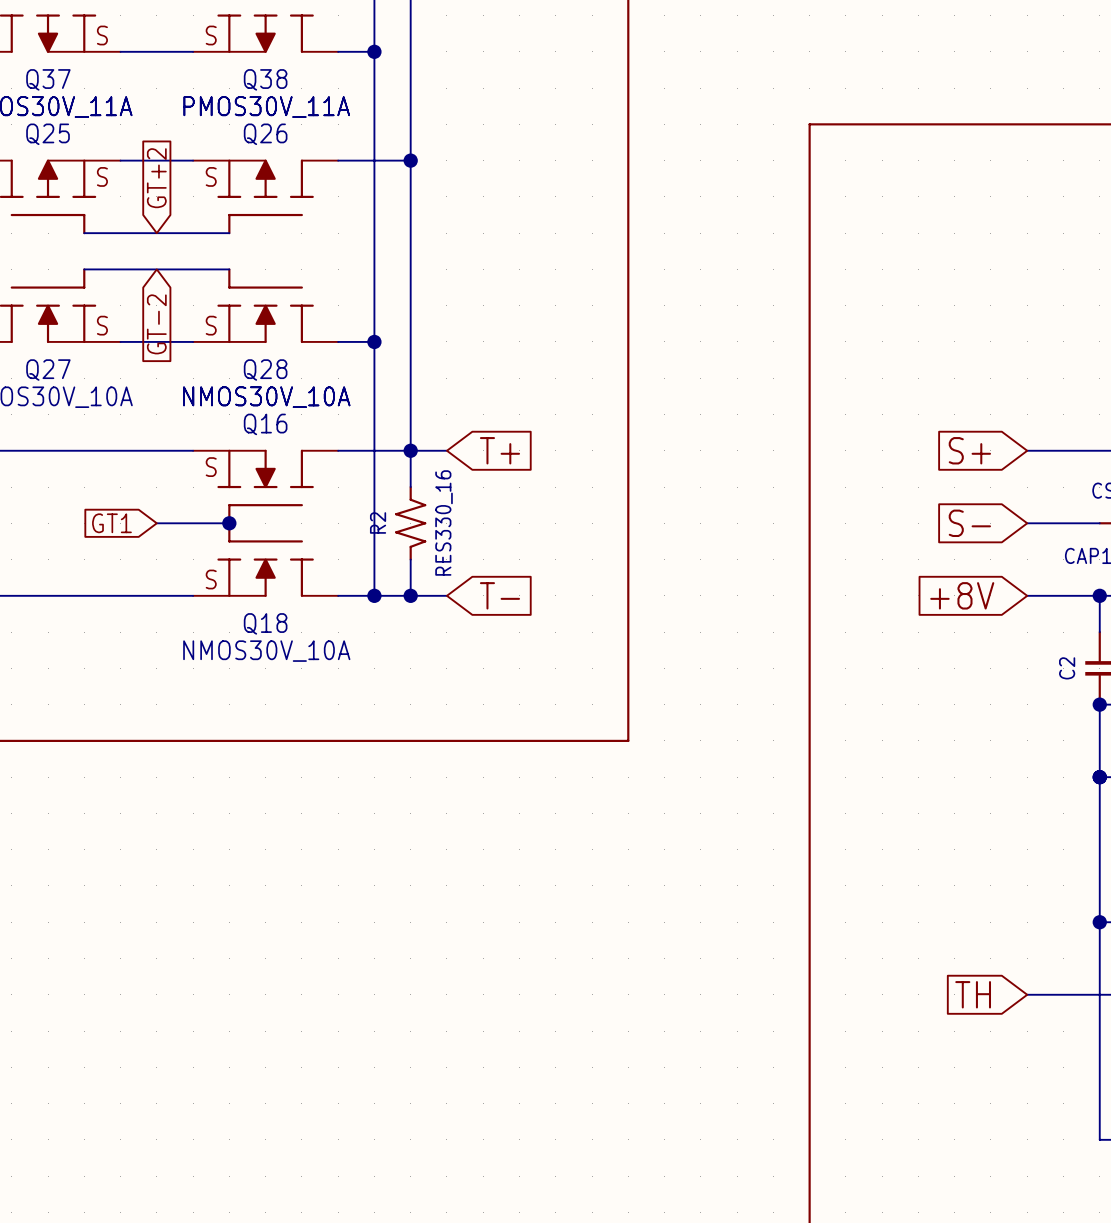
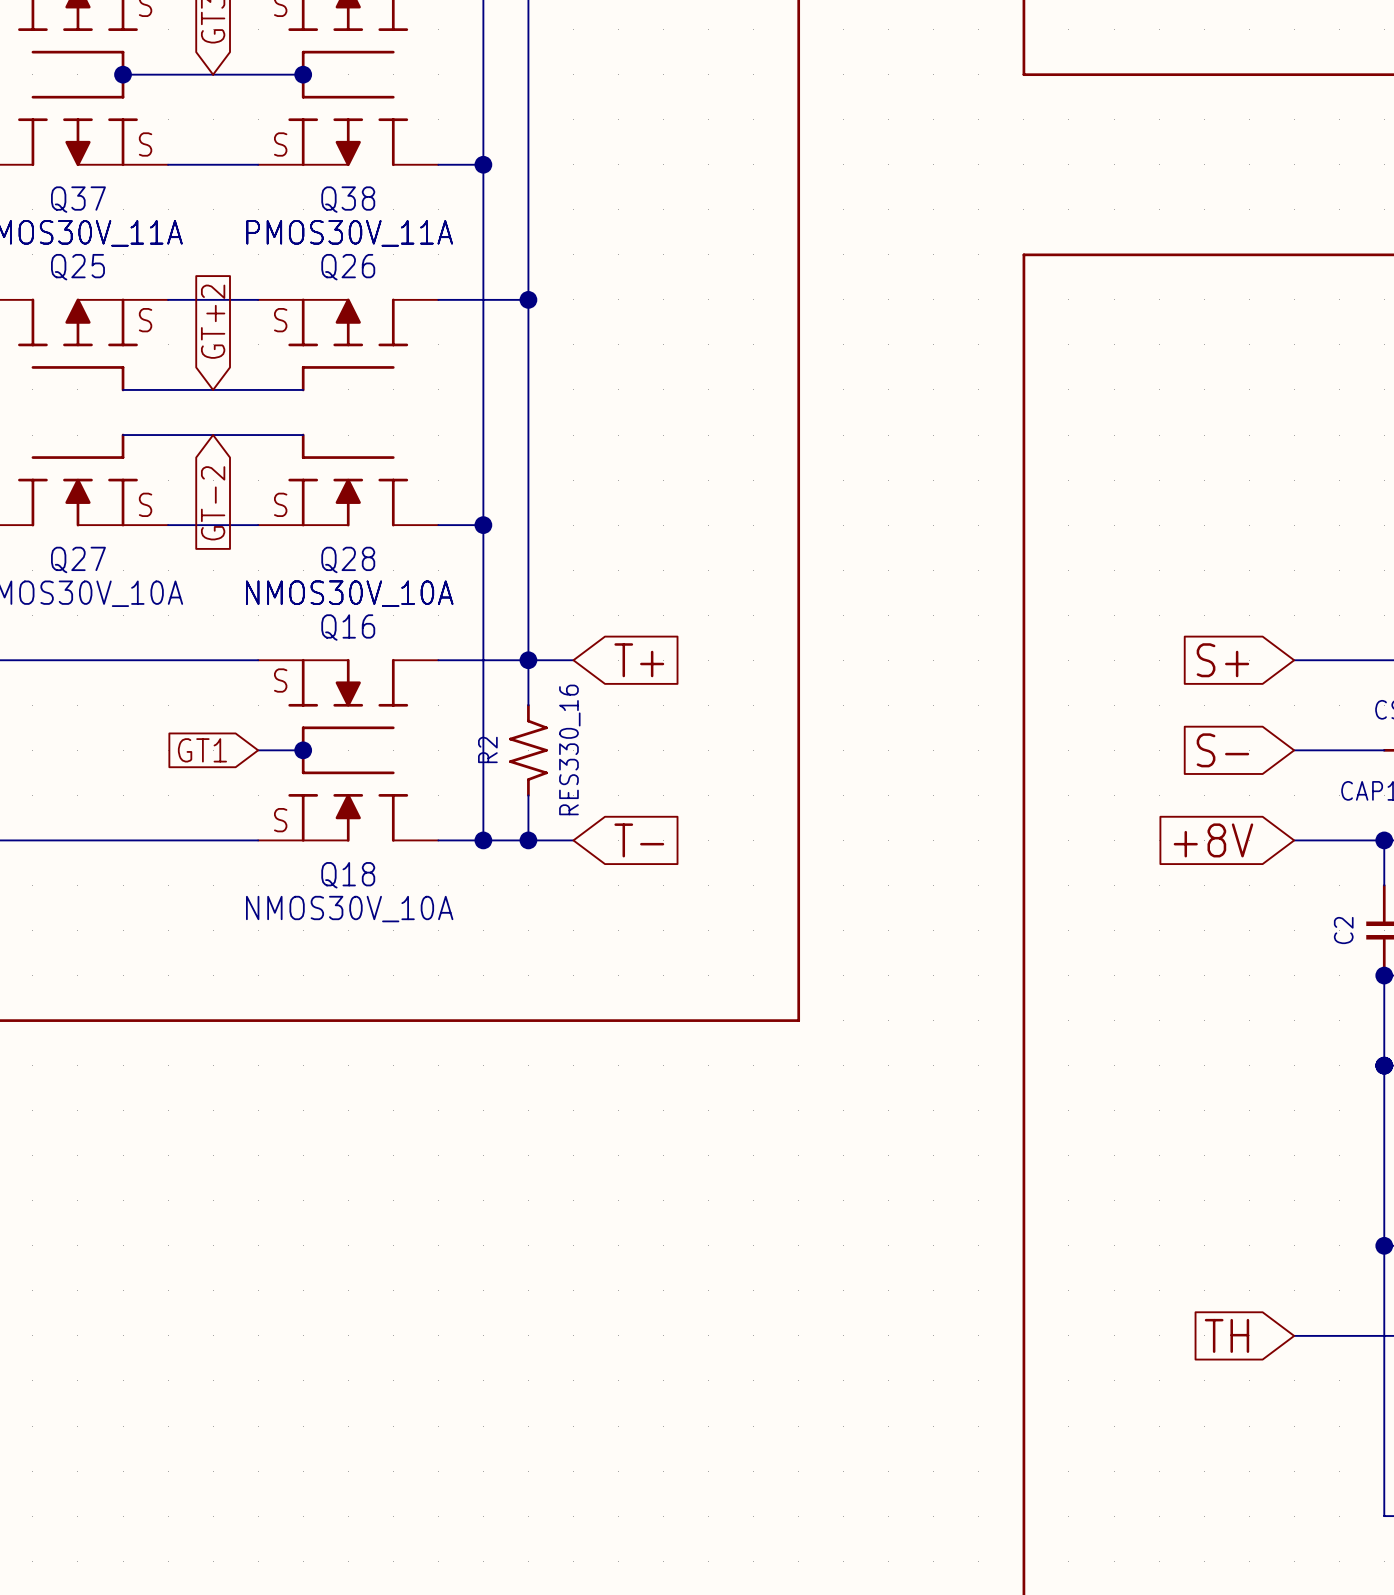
global label position: GT1 (111, 523) -> GT1 (202, 750)
wire: (156, 523) (193, 523) -> none

